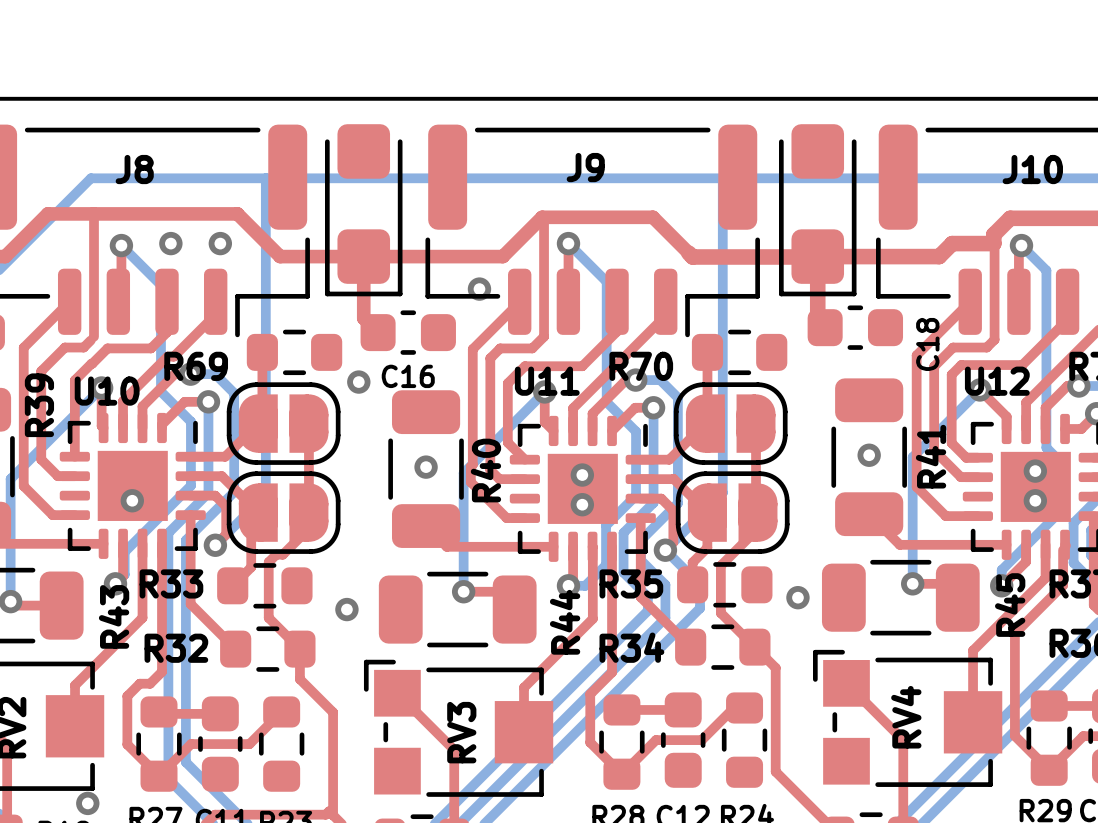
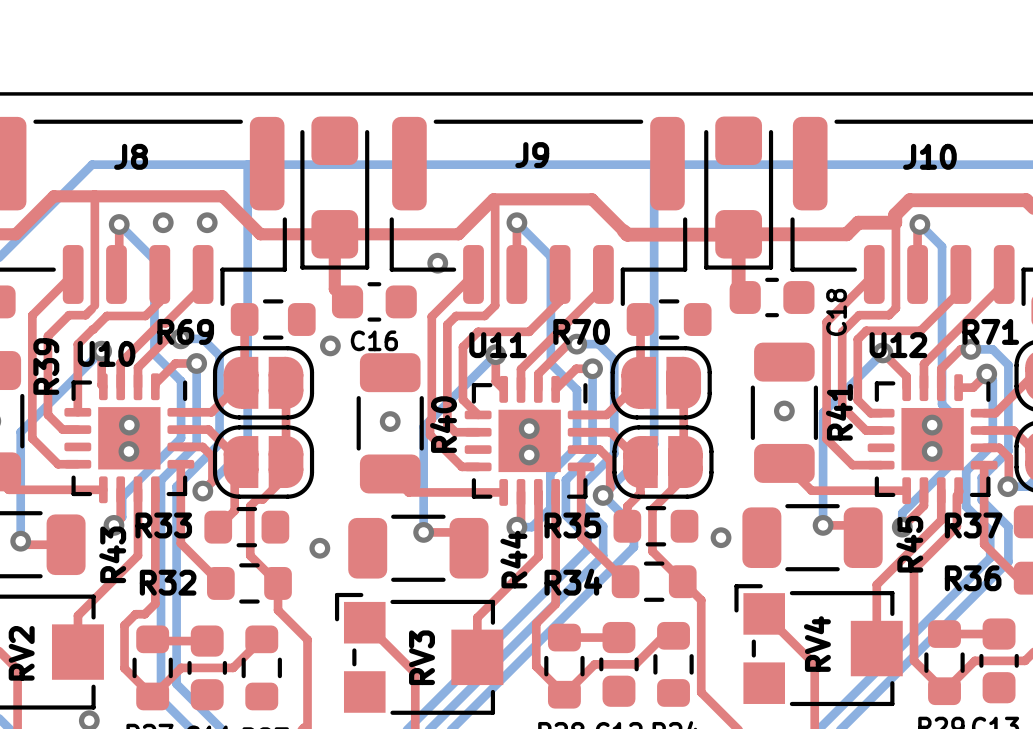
via: none -> (129, 425)

